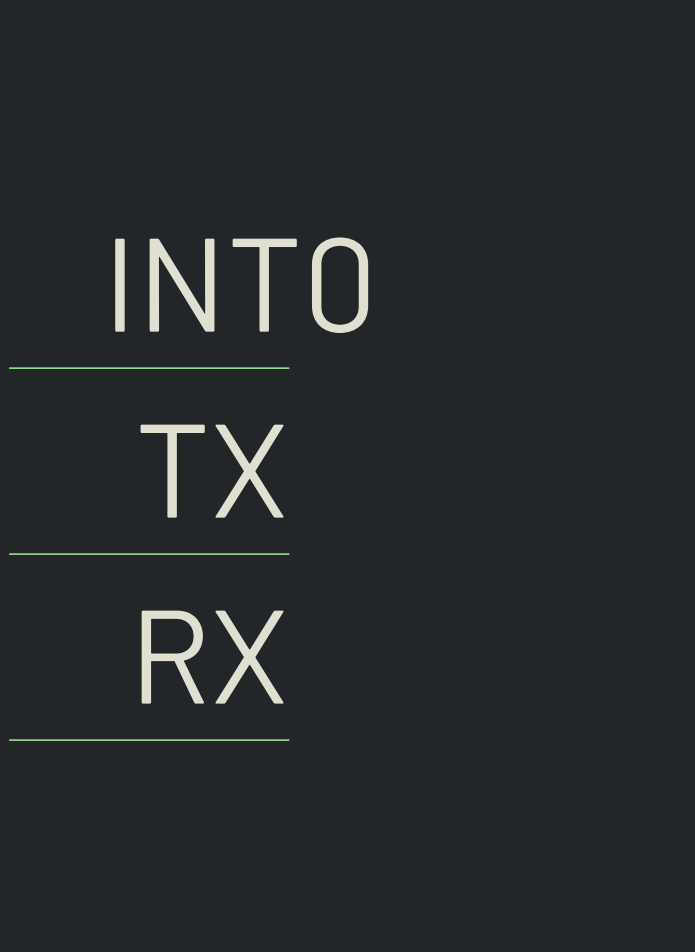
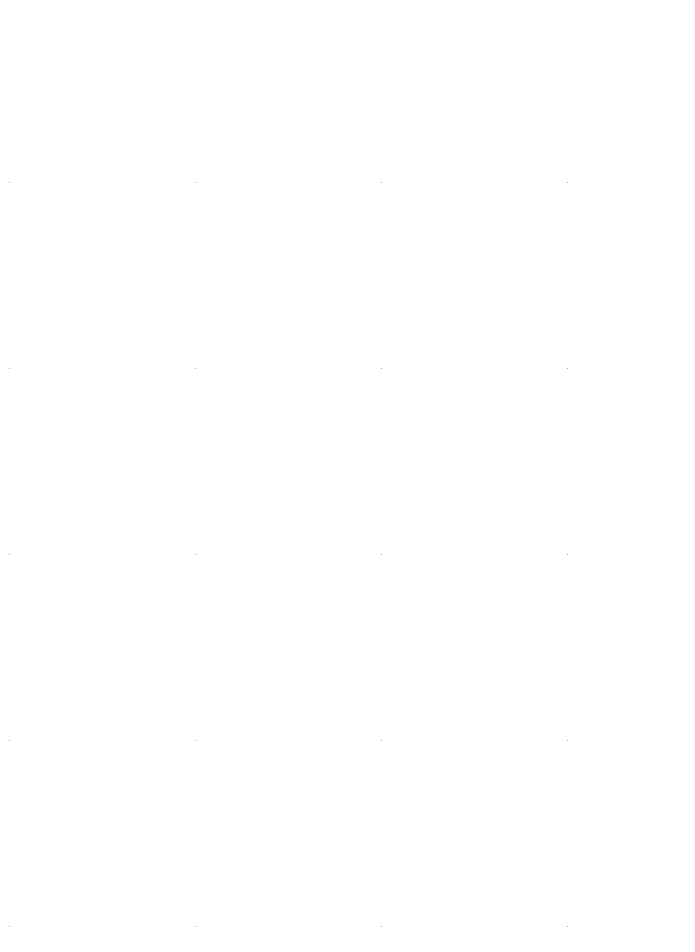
label: INT0 (241, 285) -> none
wire: (9, 368) (288, 368) -> none
label: TX (212, 471) -> none
wire: (9, 554) (288, 554) -> none
label: RX (212, 657) -> none
wire: (9, 740) (288, 740) -> none

